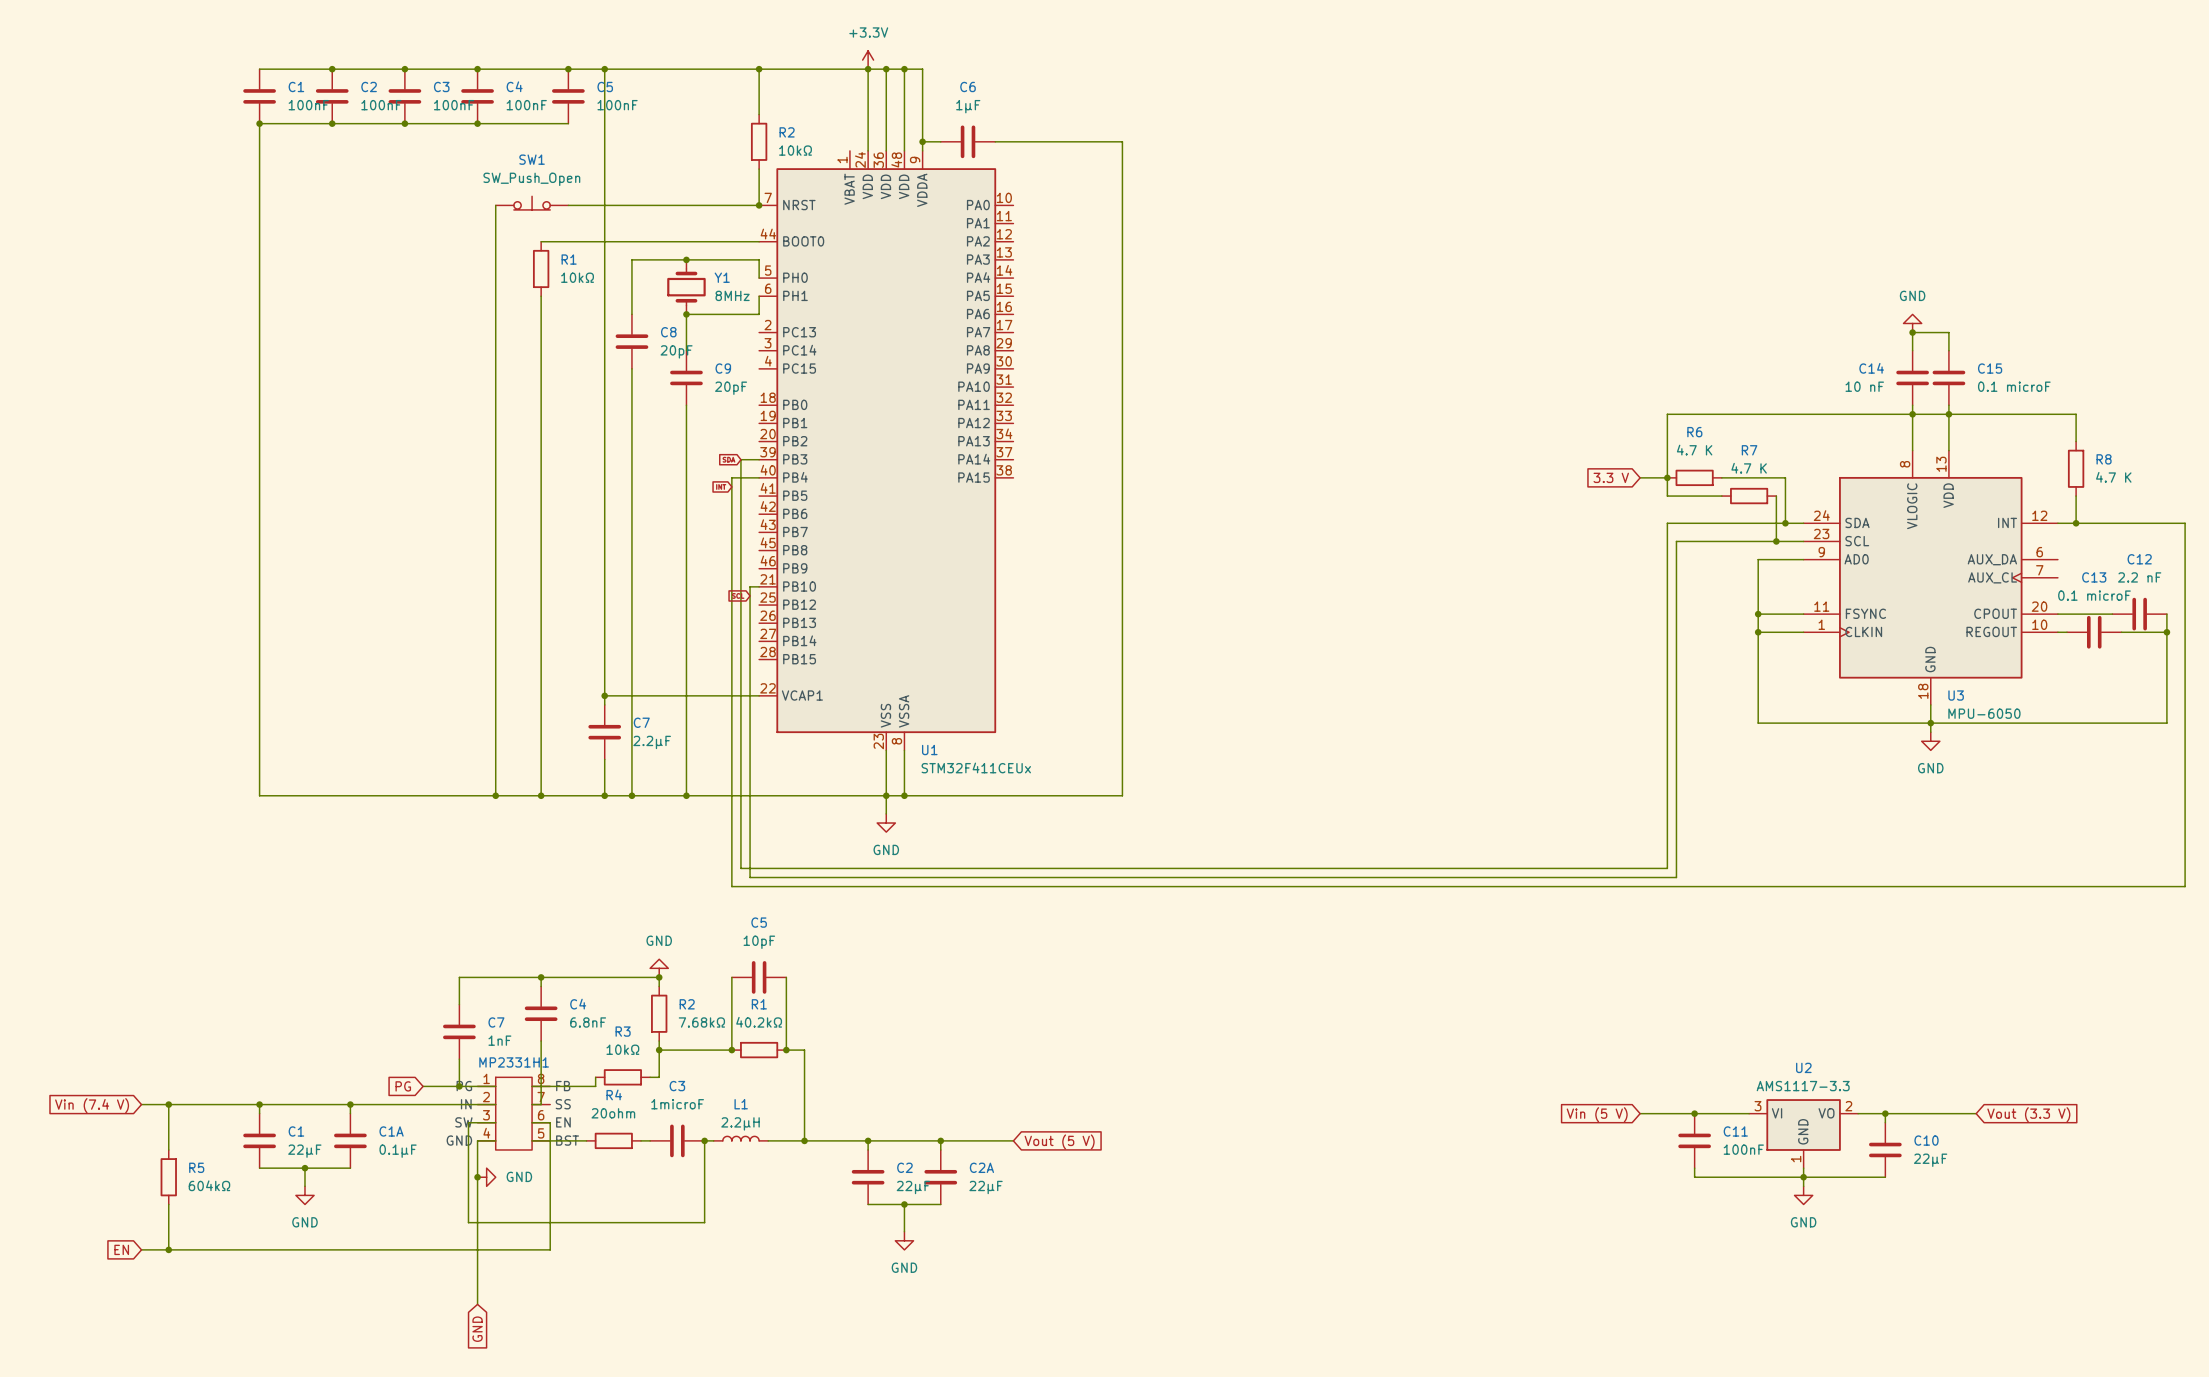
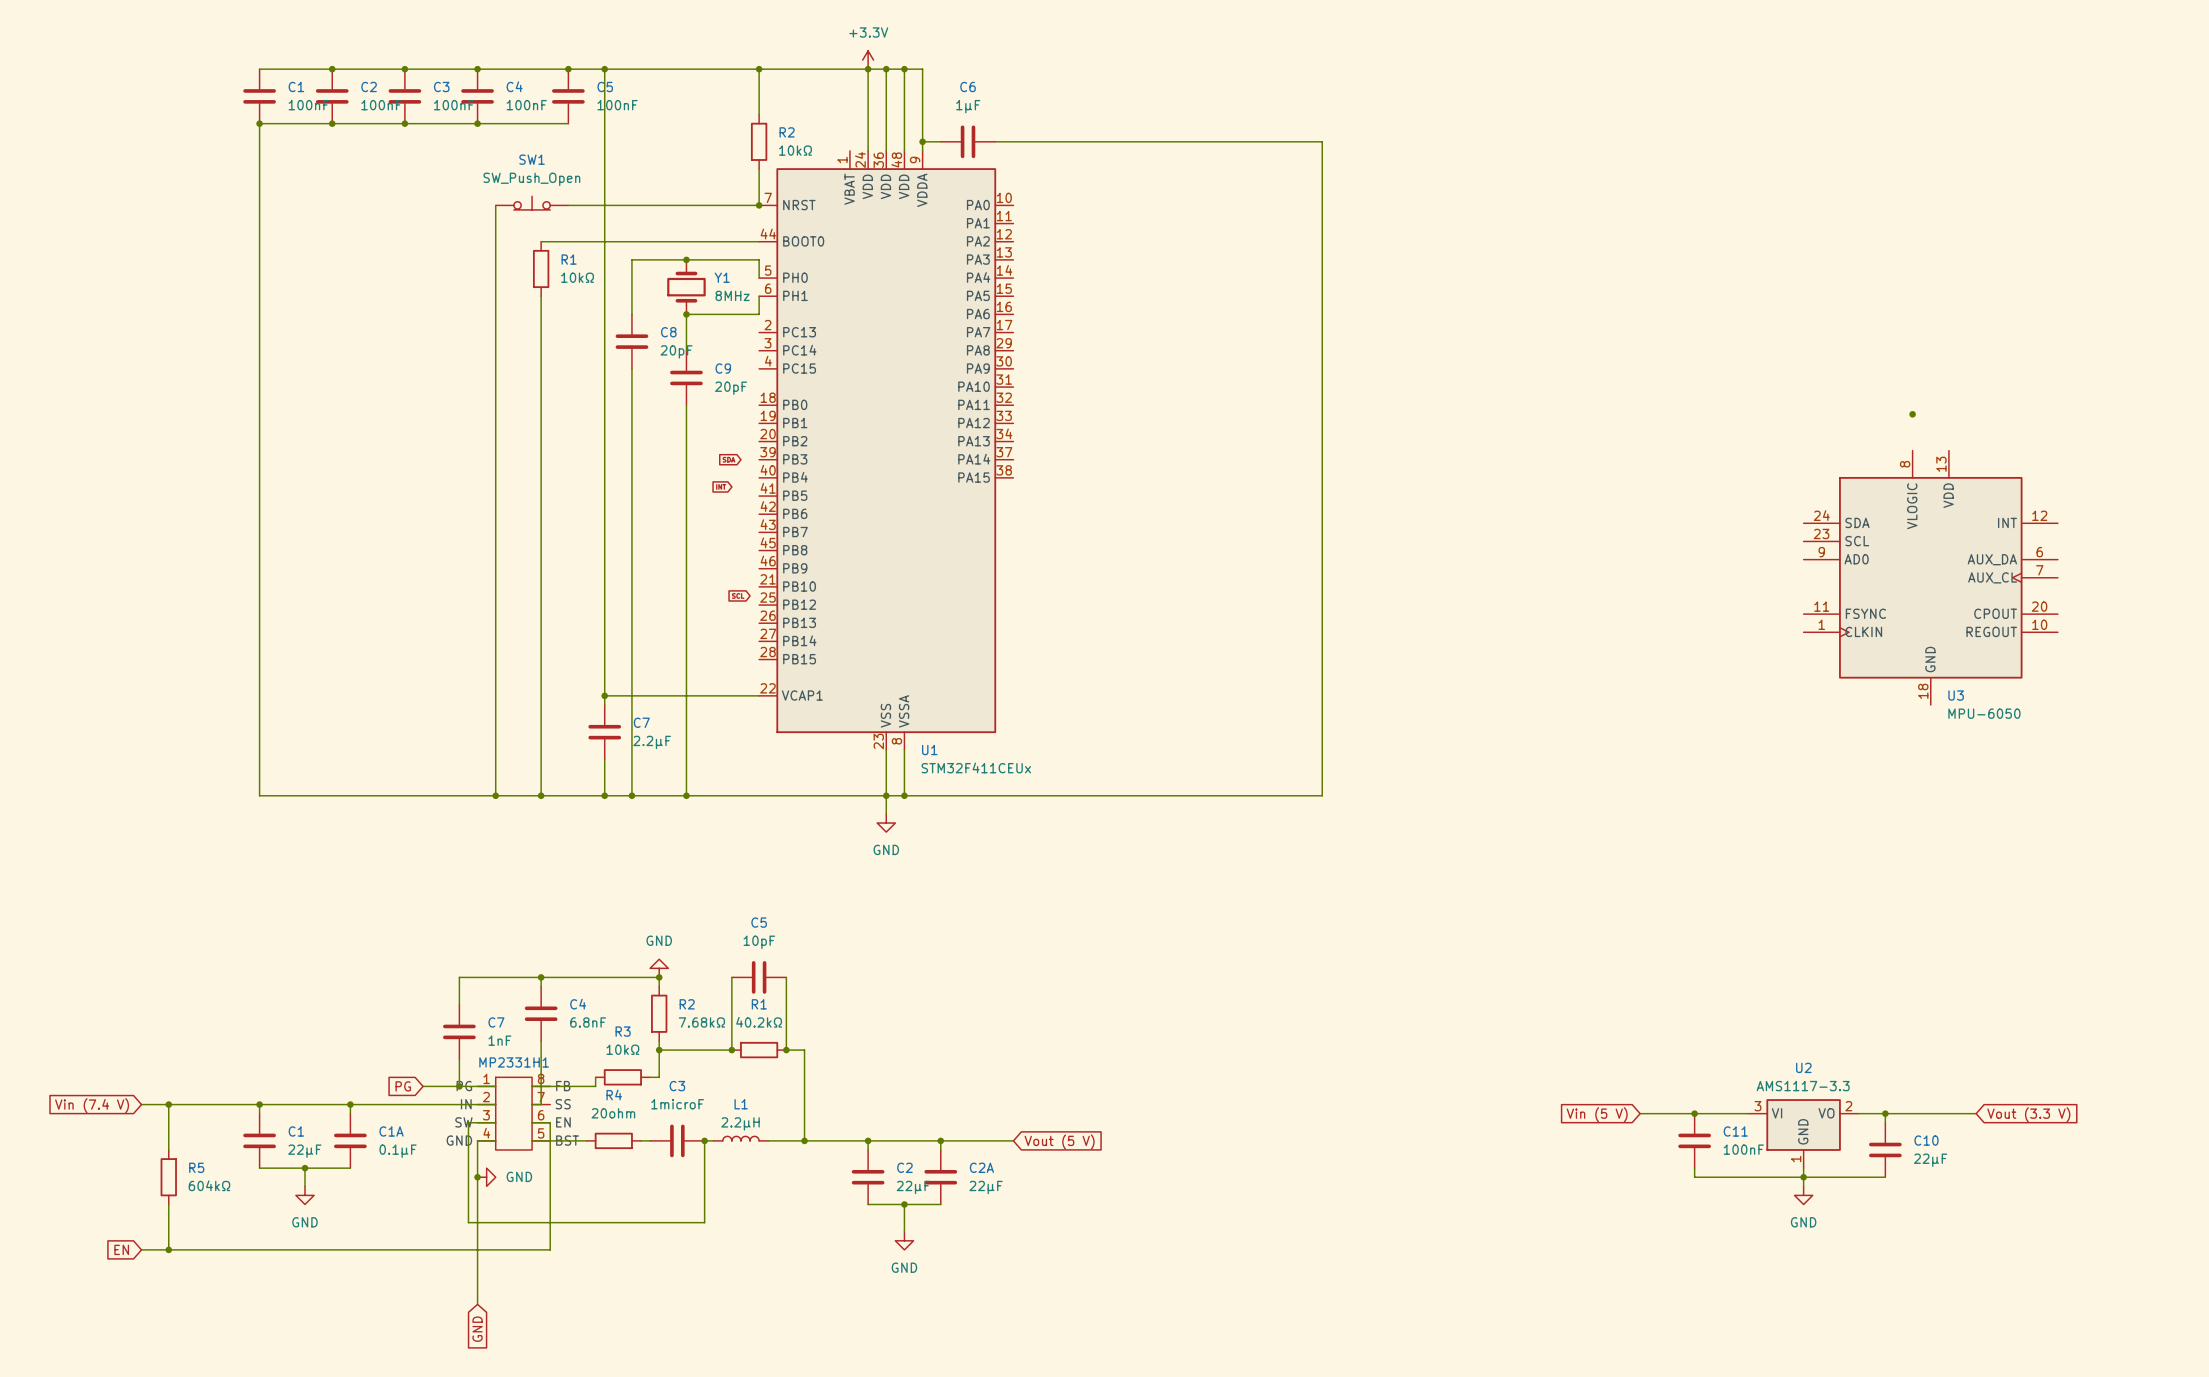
wire: (1122, 141) (1122, 795) -> (1122, 141) (1322, 141) (1322, 795) (1122, 795)
power symbol: GND (1912, 323) -> none
junction: (1912, 332) -> none
wire: (1912, 350) (1912, 332) (1948, 332) (1948, 350) -> none
C14: 10 nF (1912, 377) -> none
C15: 0.1 microF (1948, 377) -> none
wire: (1912, 405) (1912, 450) -> none
wire: (1948, 405) (1948, 450) -> none
junction: (1948, 414) -> none
wire: (2076, 441) (2076, 414) (1667, 414) (1667, 496) (1721, 496) -> none
wire: (759, 459) (740, 459) (740, 868) (1667, 868) (1667, 523) (1803, 523) -> none
R8: 4.7 K (2076, 468) -> none
wire: (759, 477) (731, 477) (731, 886) (2185, 886) (2185, 523) (2057, 523) -> none
global label: 3.3 V (1611, 477) -> none
wire: (1640, 477) (1667, 477) -> none
junction: (1667, 477) -> none
R6: 4.7 K (1694, 477) -> none
wire: (1721, 477) (1785, 477) (1785, 523) -> none
R7: 4.7 K (1749, 496) -> none
wire: (1776, 496) (1776, 541) -> none
wire: (2076, 496) (2076, 523) -> none
junction: (1785, 523) -> none
junction: (2076, 523) -> none
junction: (1776, 541) -> none
wire: (1803, 541) (1676, 541) (1676, 877) (750, 877) (750, 586) (759, 586) -> none
wire: (1803, 559) (1758, 559) (1758, 723) (2166, 723) (2166, 614) -> none
wire: (1758, 614) (1803, 614) -> none
junction: (1758, 614) -> none
wire: (2057, 614) (2112, 614) -> none
C12: 2.2 nF (2139, 614) -> none
wire: (1758, 632) (1803, 632) -> none
junction: (1758, 632) -> none
wire: (2057, 632) (2067, 632) -> none
C13: 0.1 microF (2094, 632) -> none
wire: (2121, 632) (2166, 632) -> none
junction: (2166, 632) -> none
wire: (1930, 704) (1930, 732) -> none
junction: (1930, 723) -> none
power symbol: GND (1930, 741) -> none

